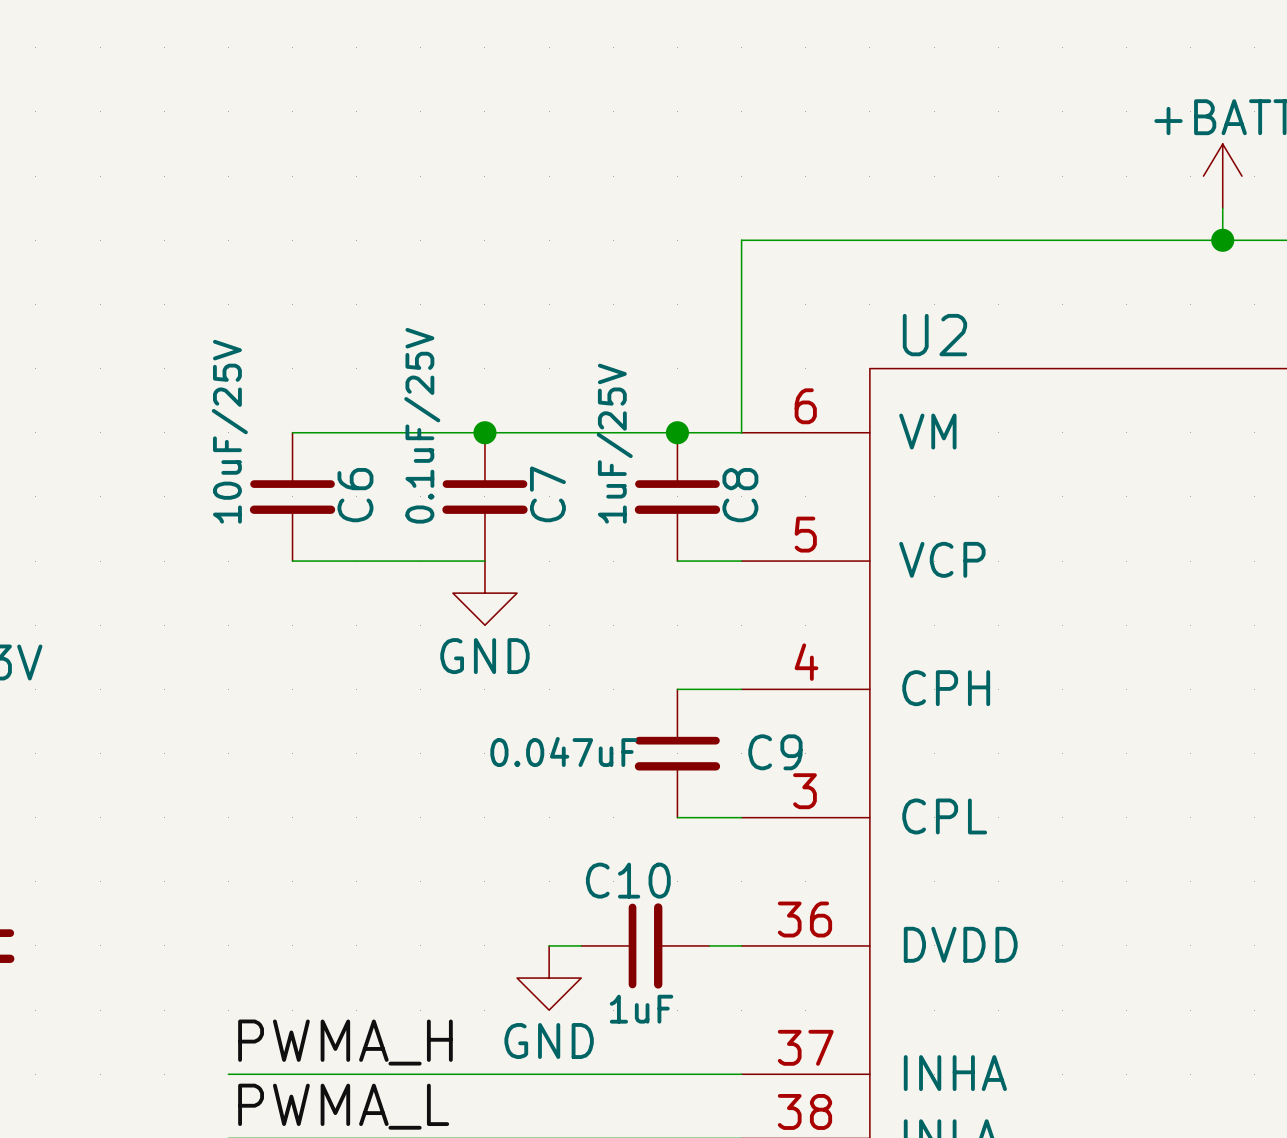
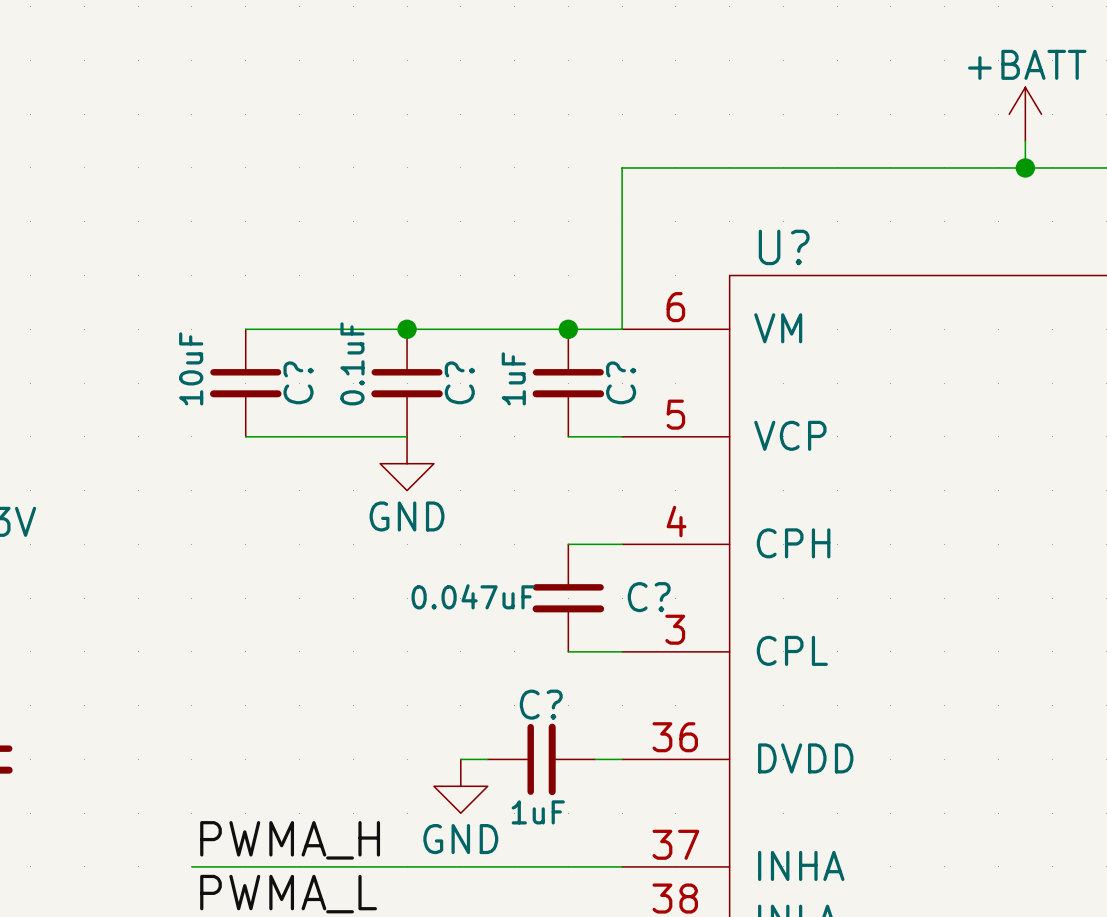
U2 name: U2 (934, 335) -> U? (784, 247)
C7 value: 0.1uF/25V (422, 425) -> 0.1uF (352, 363)
C6 value: 10uF/25V (229, 431) -> 10uF (191, 368)
C8 value: 1uF/25V (614, 443) -> 1uF (513, 378)
C7 name: C7 (547, 494) -> C? (459, 382)
C6 name: C6 (355, 495) -> C? (298, 382)
C8 name: C8 (740, 495) -> C? (621, 382)
C9 name: C9 (775, 752) -> C? (649, 597)
C10 name: C10 (628, 880) -> C? (541, 704)

